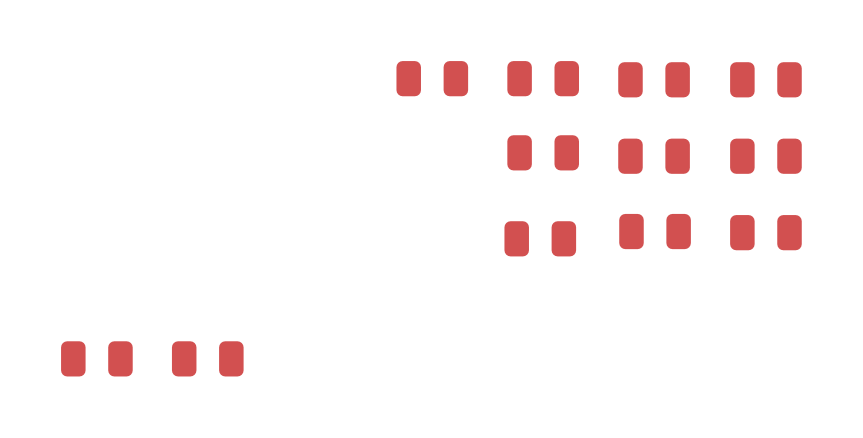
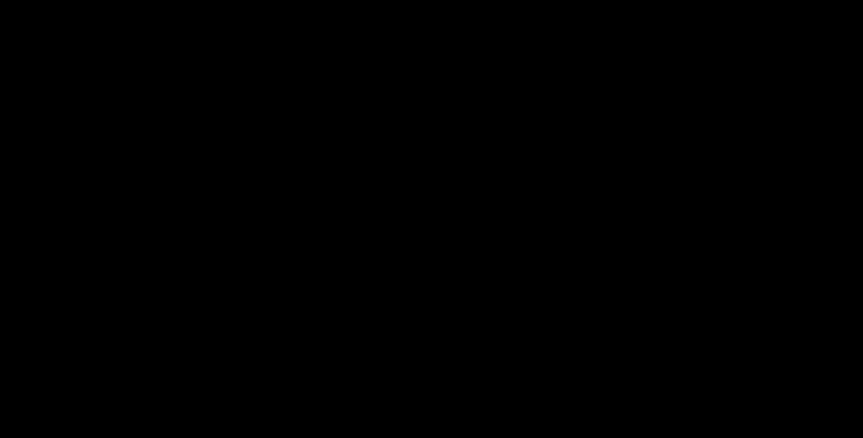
part: (432, 78) -> none
part: (543, 78) -> none
part: (654, 79) -> none
part: (765, 79) -> none
part: (543, 152) -> none
part: (654, 156) -> none
part: (765, 156) -> none
part: (655, 231) -> none
part: (765, 232) -> none
part: (540, 238) -> none
part: (96, 358) -> none
part: (207, 358) -> none

